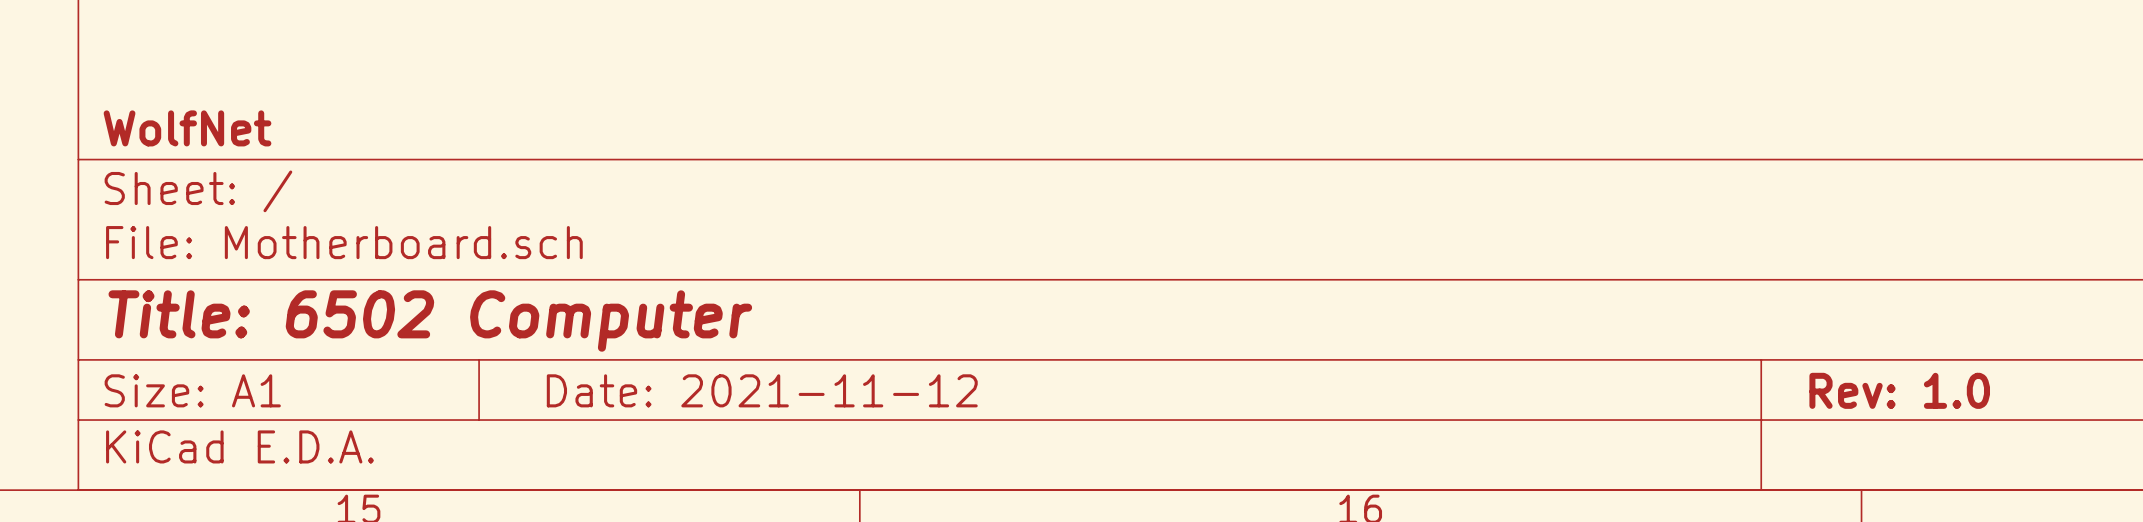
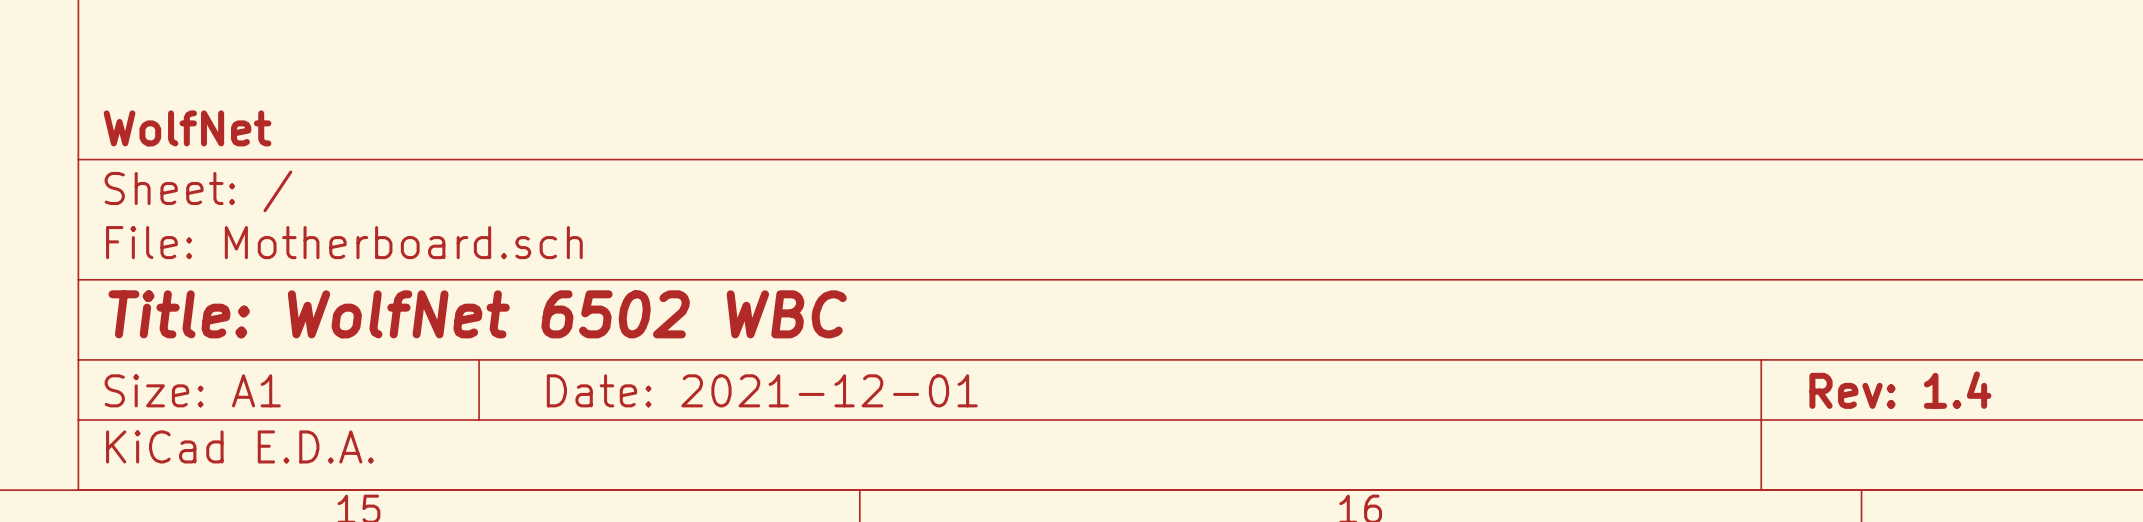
title block: Title: 6502 Computer (430, 321) -> Title: WolfNet 6502 WBC (477, 314)
title block: Date: 2021-11-12 (762, 390) -> Date: 2021-12-01 (762, 390)
title block: Rev: 1.0 (1899, 390) -> Rev: 1.4 (1900, 390)

